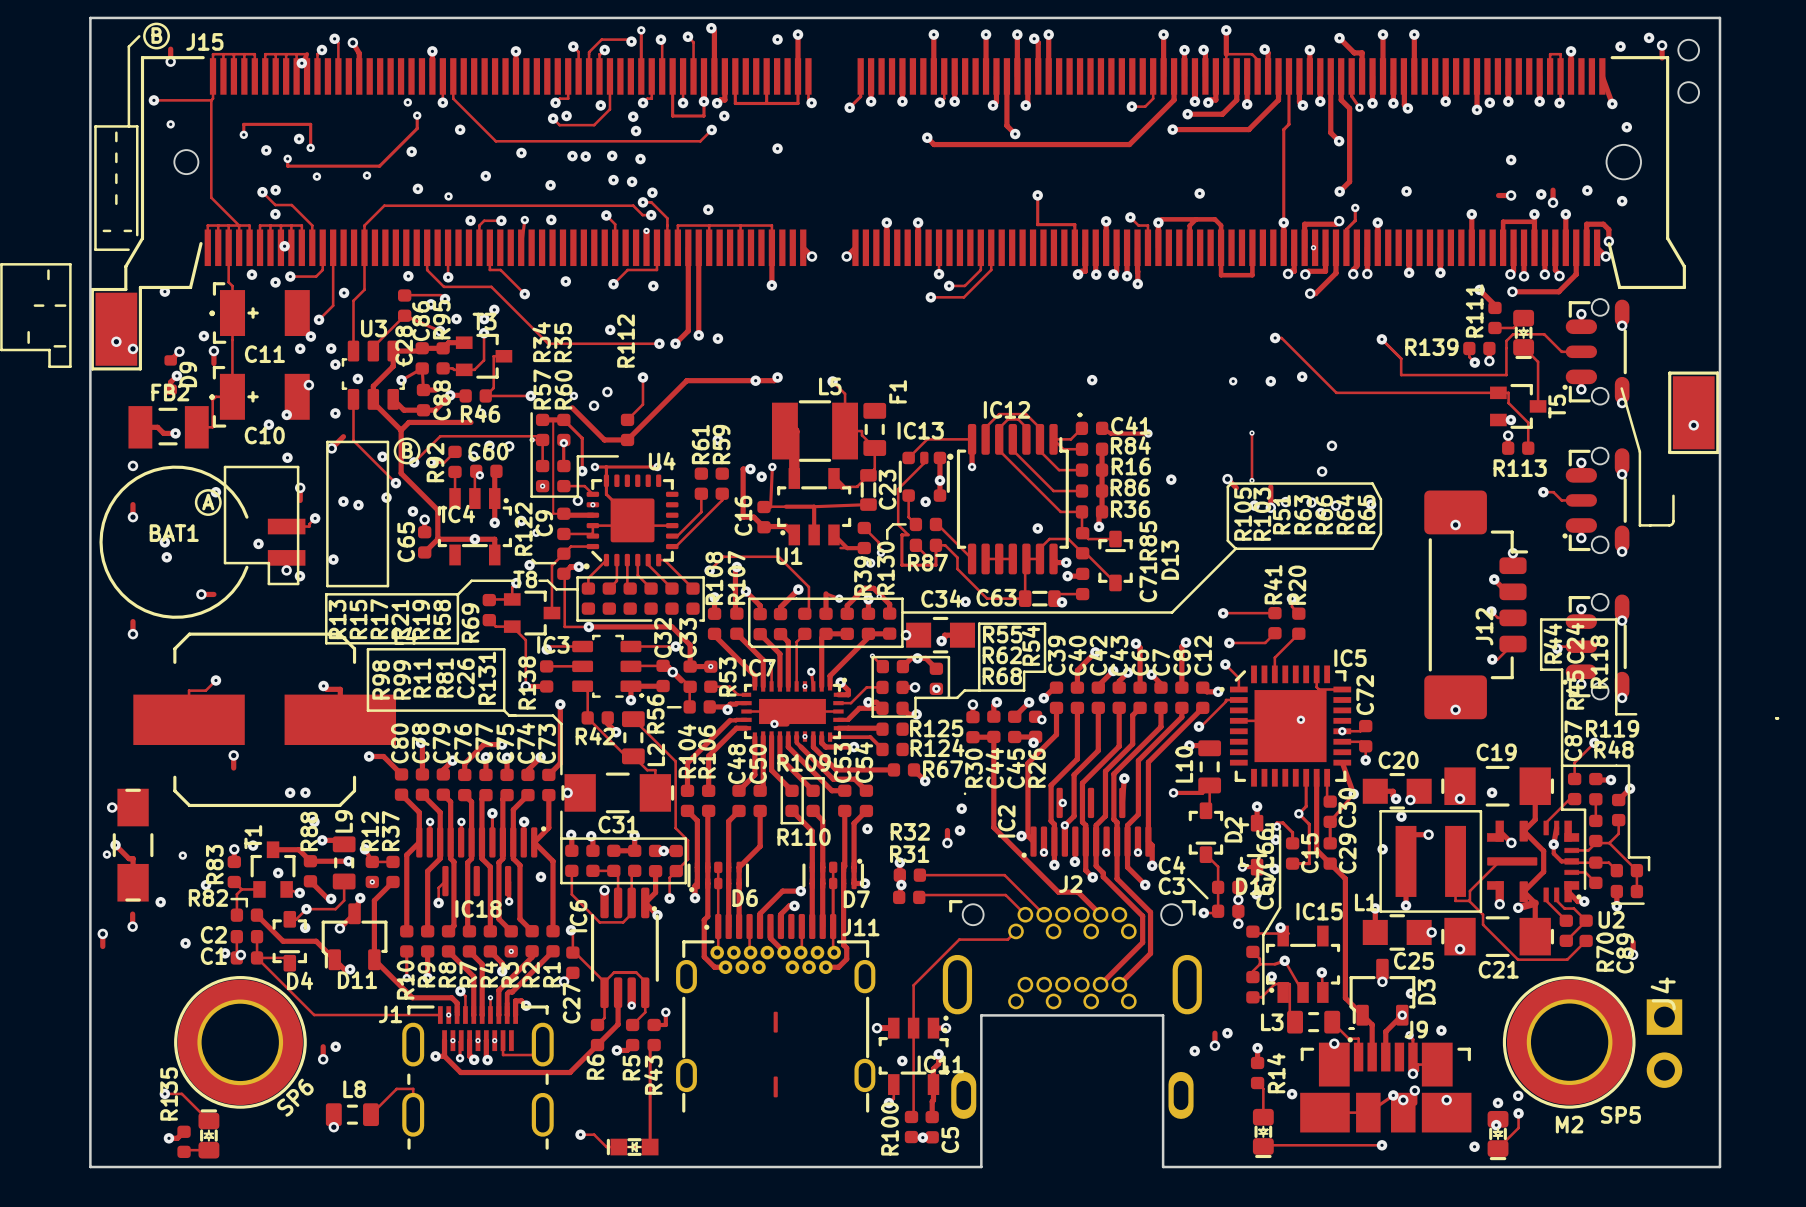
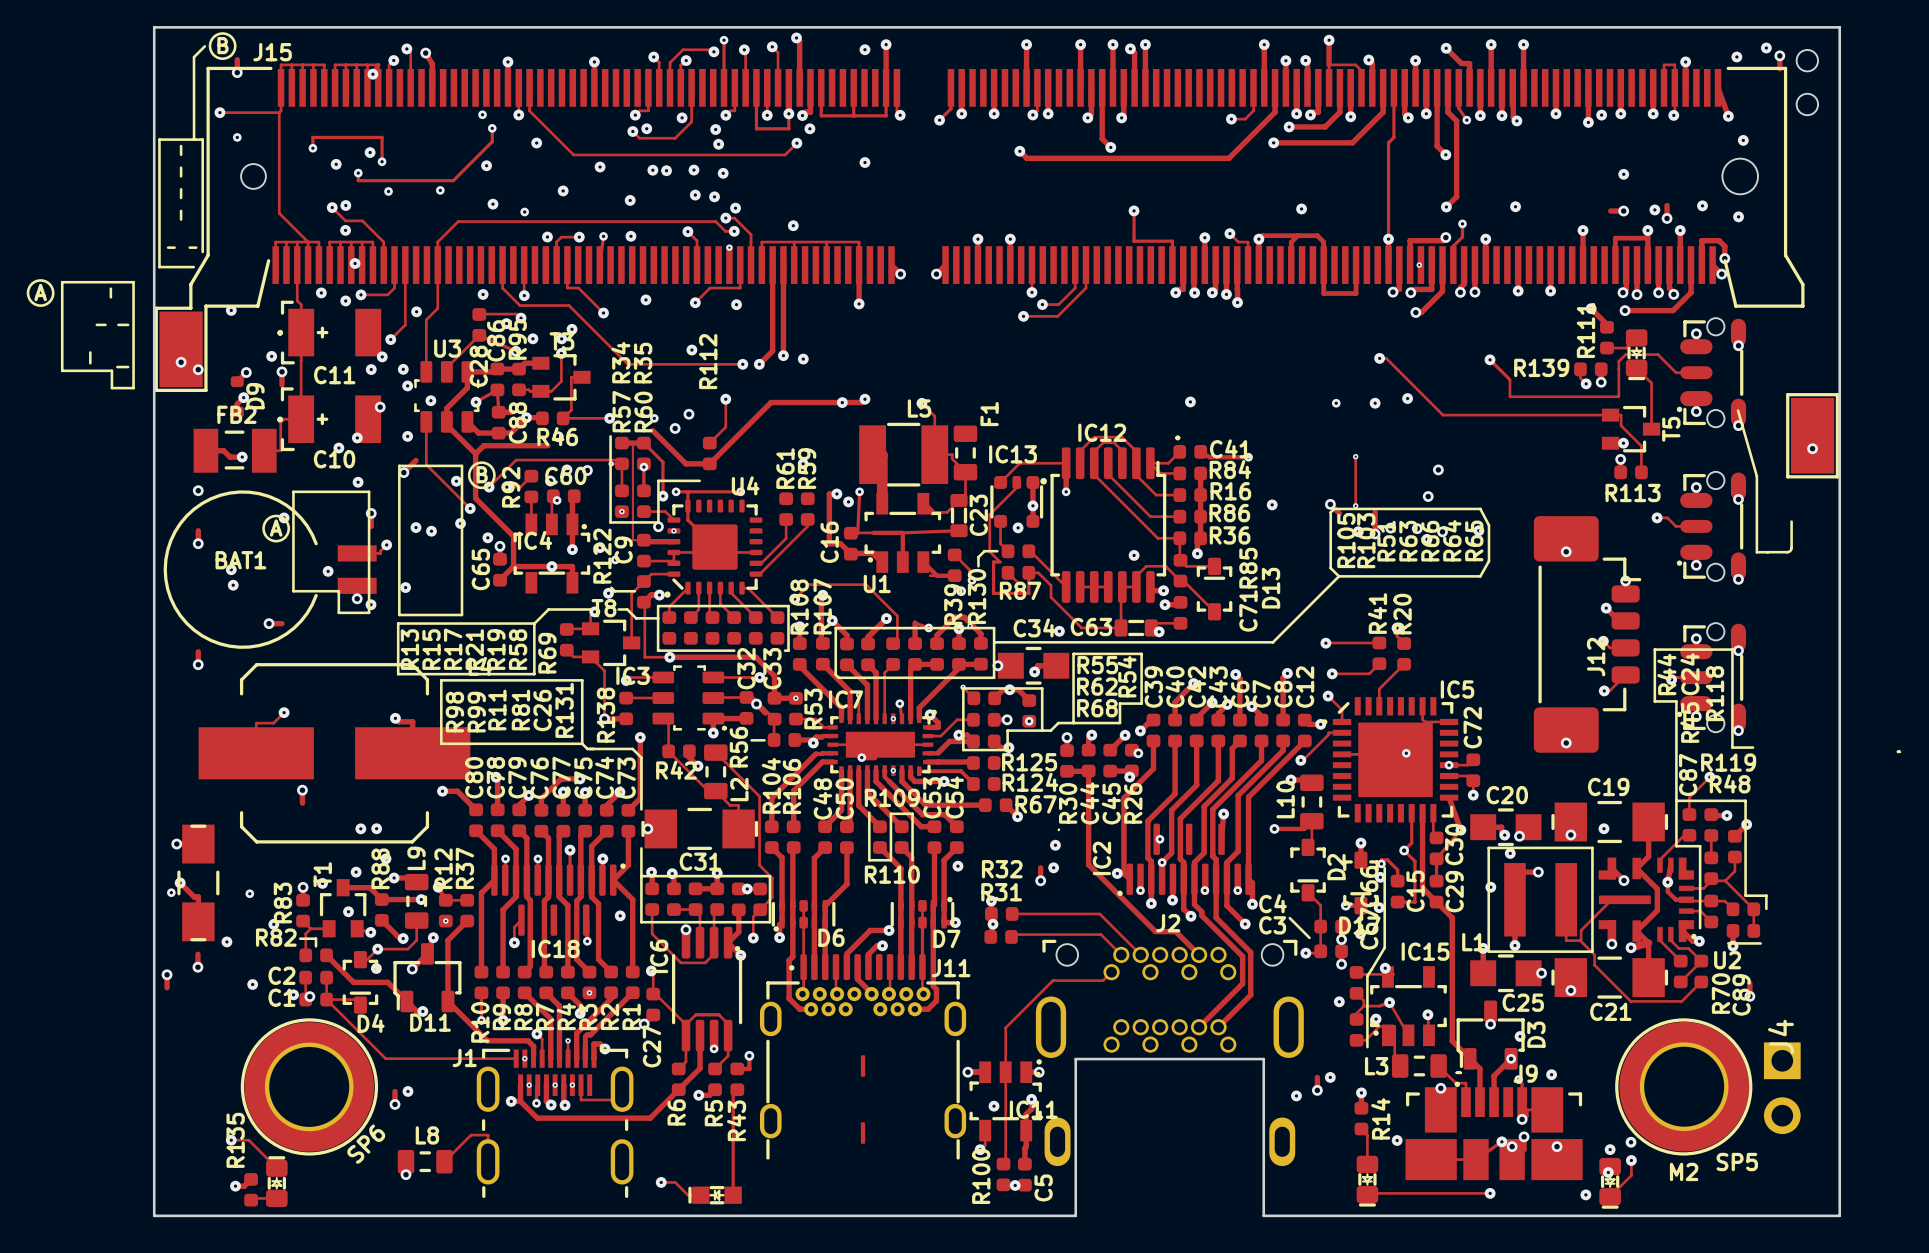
via: none -> (356, 872)
via: none -> (1339, 1001)

